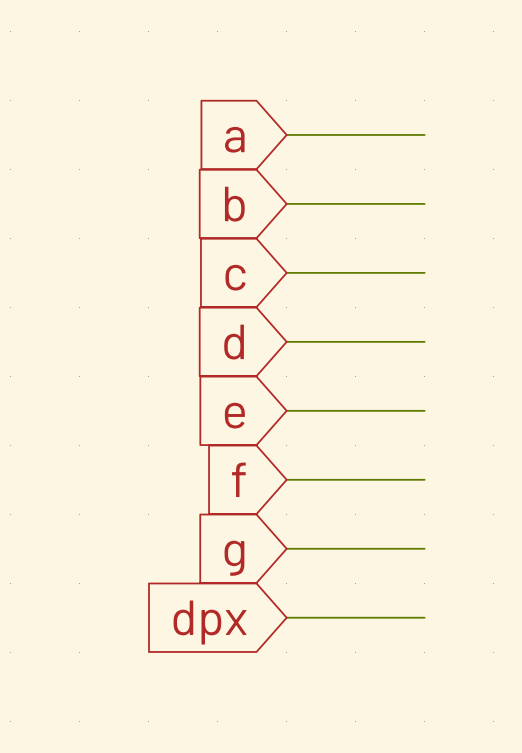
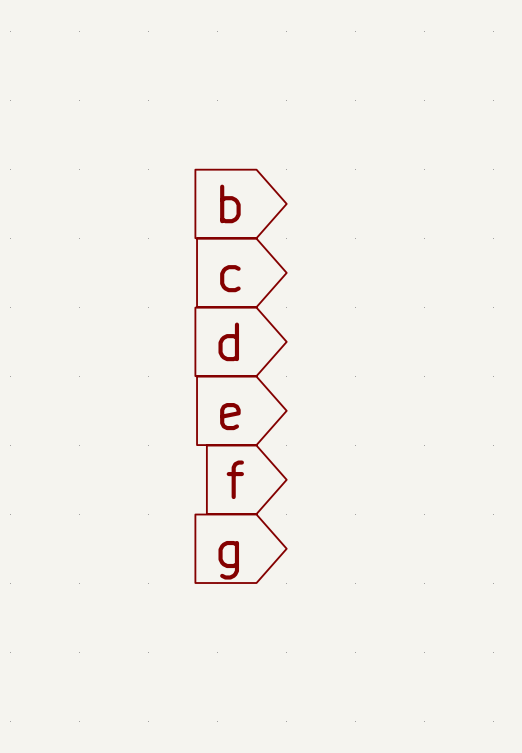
wire: (286, 134) (424, 134) -> none
global label: a (234, 139) -> none
wire: (286, 203) (424, 203) -> none
wire: (286, 272) (424, 272) -> none
wire: (286, 341) (424, 341) -> none
wire: (286, 410) (424, 410) -> none
wire: (286, 479) (424, 479) -> none
wire: (286, 548) (424, 548) -> none
wire: (286, 617) (424, 617) -> none
global label: dpx (210, 622) -> none

